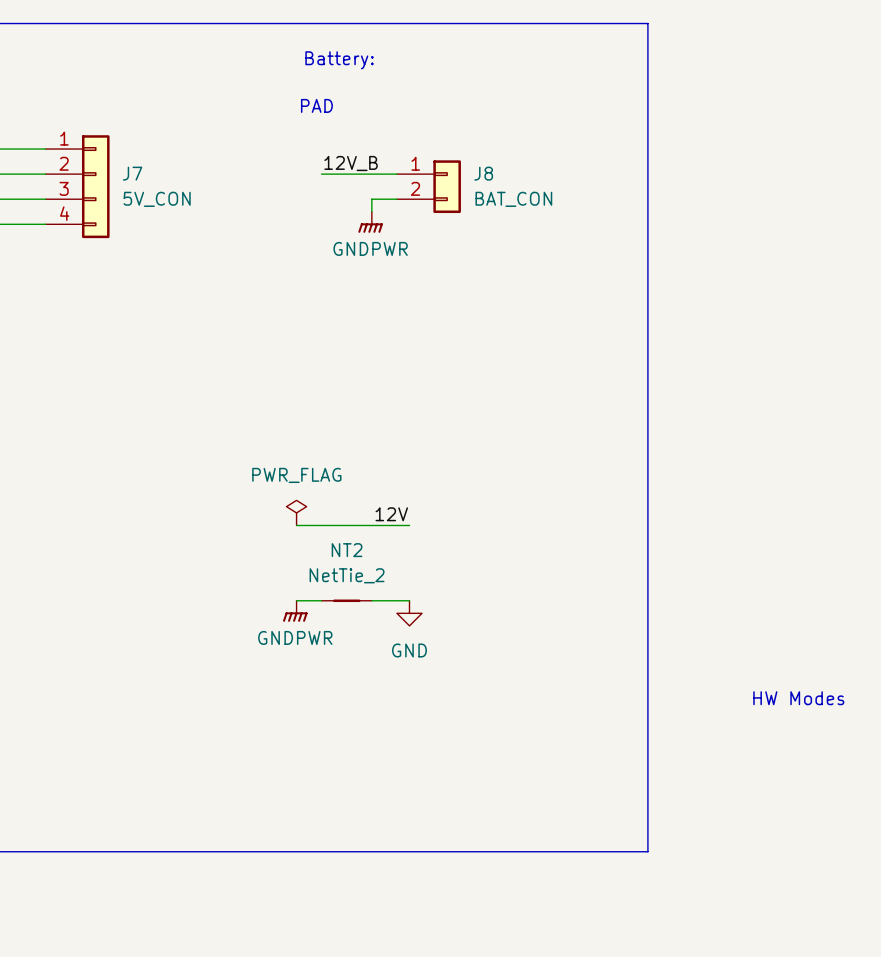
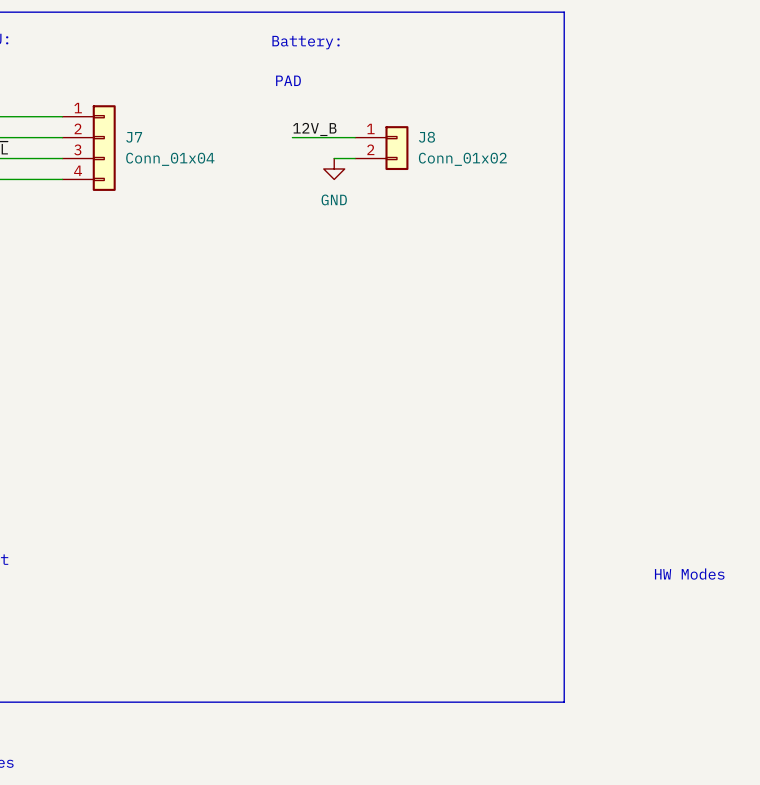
J7 value: 5V_CON (157, 199) -> Conn_01x04 (170, 159)
J8 value: BAT_CON (513, 199) -> Conn_01x02 (462, 159)
power symbol: none -> GND (334, 168)
power symbol: GNDPWR (370, 222) -> none
power symbol: PWR_FLAG (296, 512) -> none
label: 12V (391, 514) -> none
wire: (296, 525) (409, 525) -> none
wire: (296, 600) (321, 600) -> none
NT2: NetTie_2 (346, 600) -> none
wire: (371, 600) (409, 600) -> none
power symbol: GNDPWR (295, 611) -> none
power symbol: GND (409, 613) -> none

